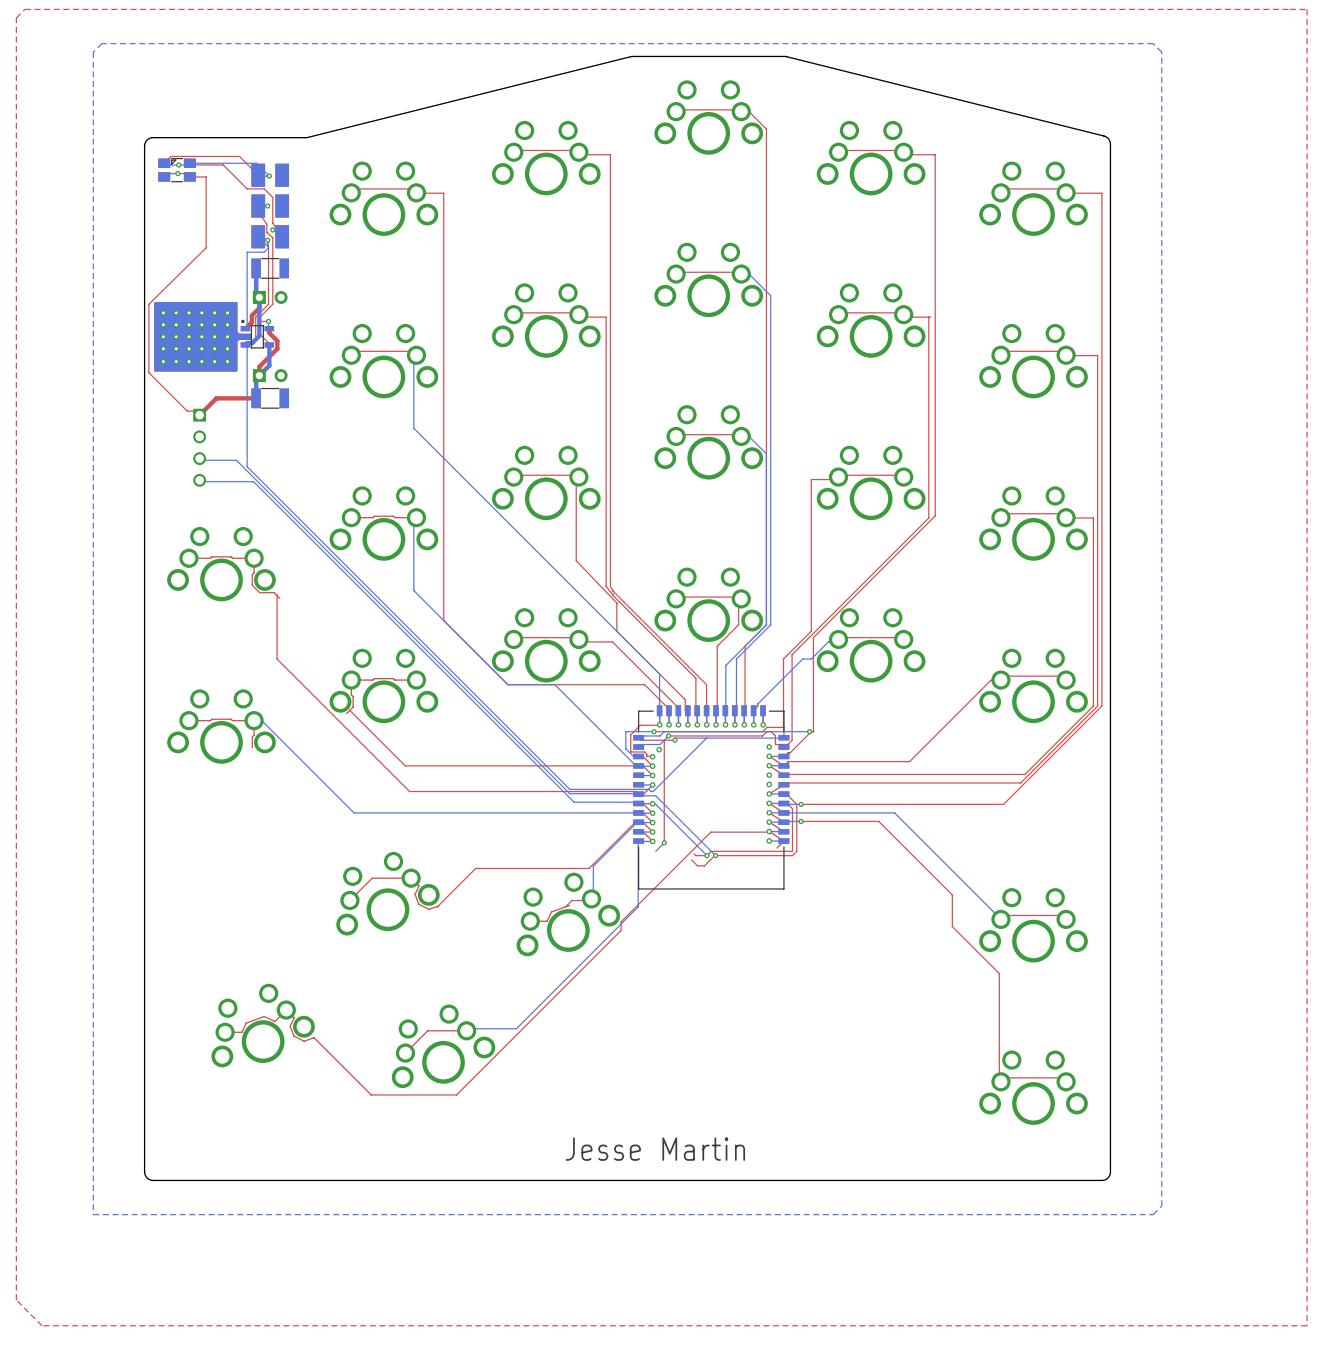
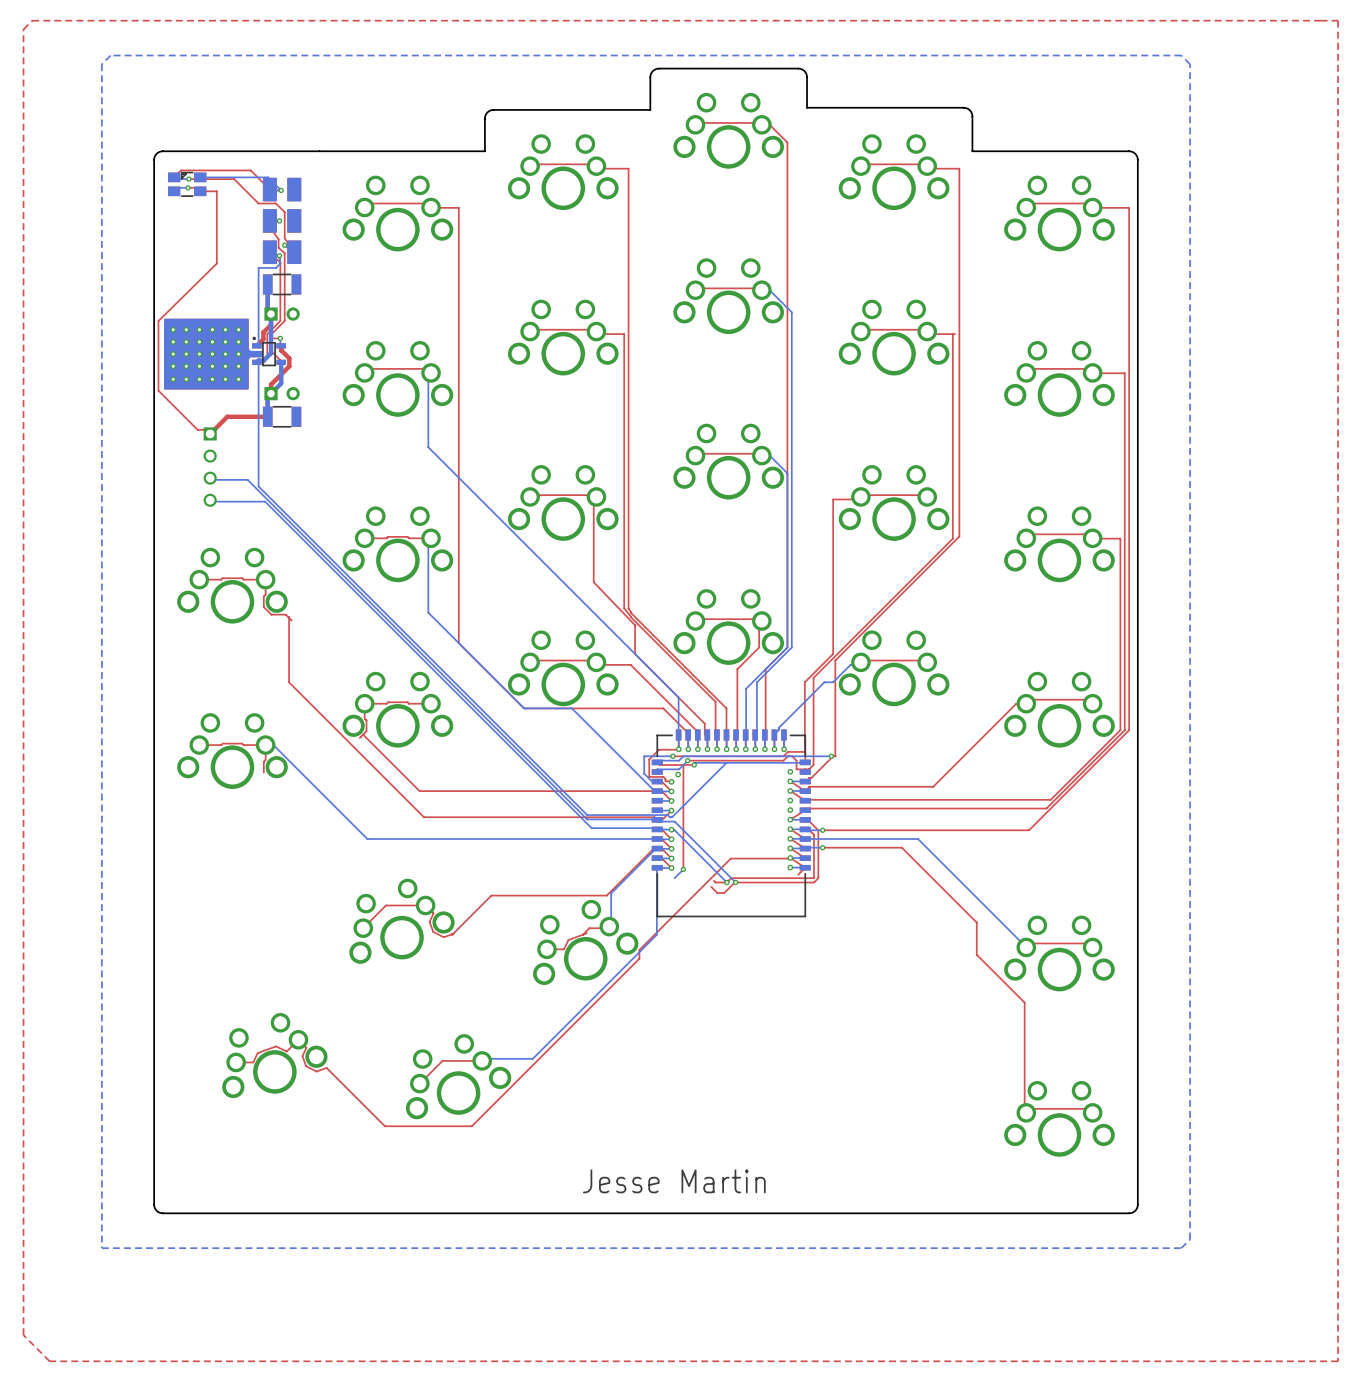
board edge: (640, 56) (630, 56) (306, 137) -> (659, 68) (653, 70) (650, 75) (650, 109) (490, 110) (485, 117) (484, 151) (319, 151)
board edge: (777, 56) (786, 56) (1103, 136) (1109, 139) (1110, 146) -> (798, 68) (803, 70) (806, 75) (807, 107) (964, 107) (969, 110) (972, 115) (972, 151) (1129, 151) (1135, 153) (1137, 159)

